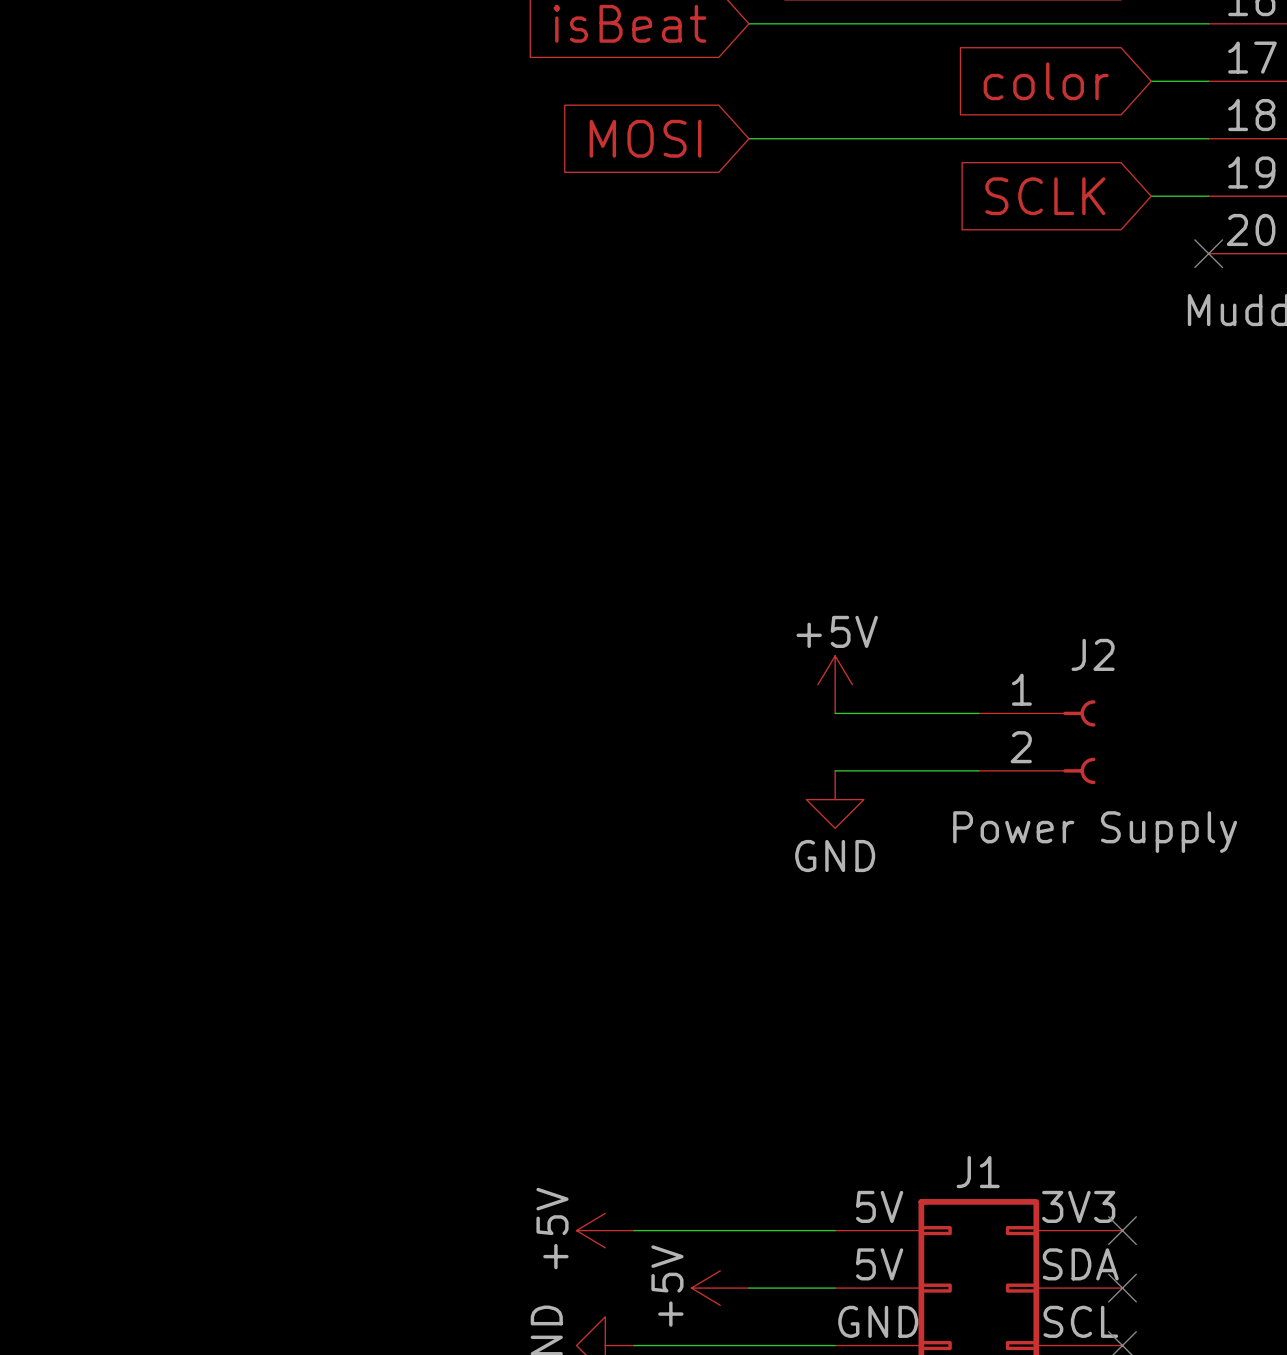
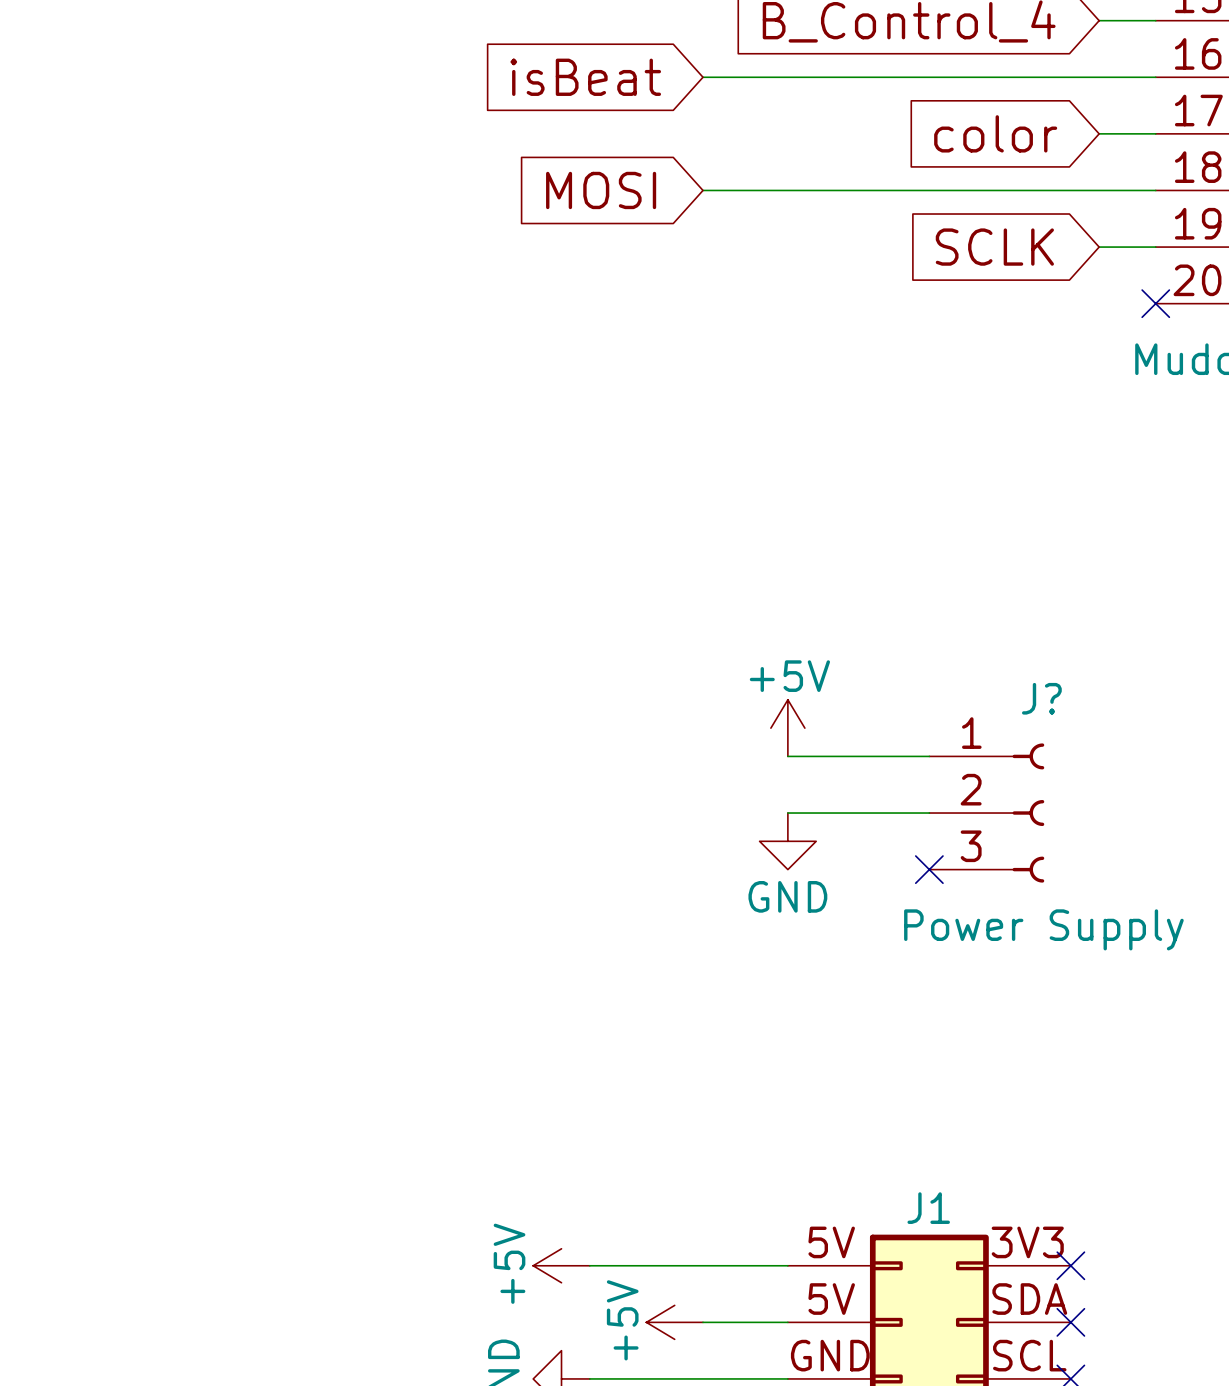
J2: Power Supply (1037, 742) -> none
J?: none -> Power Supply (986, 813)
no-connect mark: none -> (929, 869)

